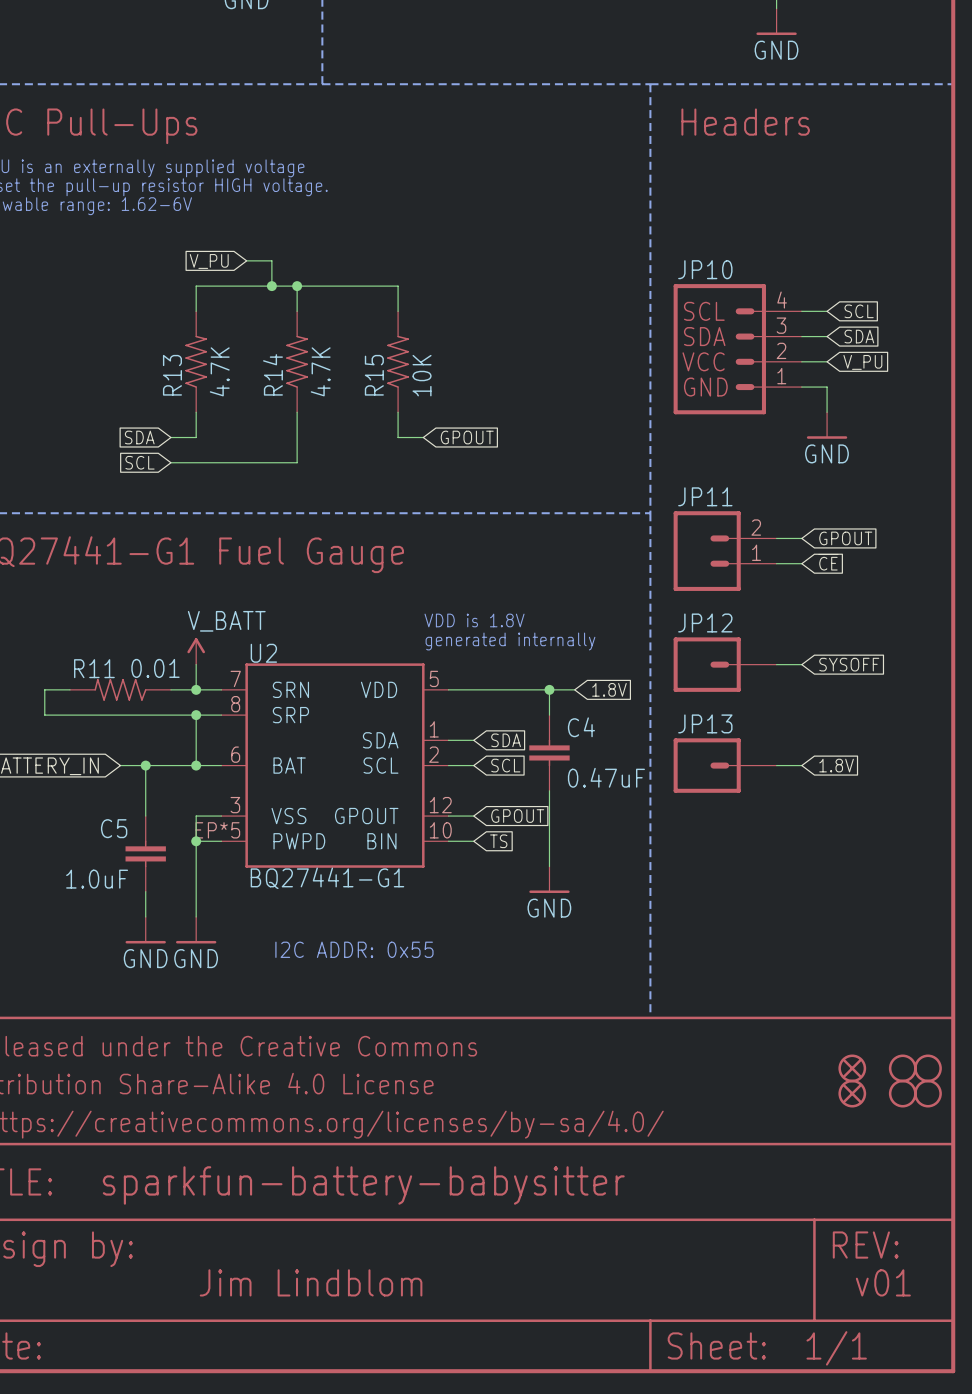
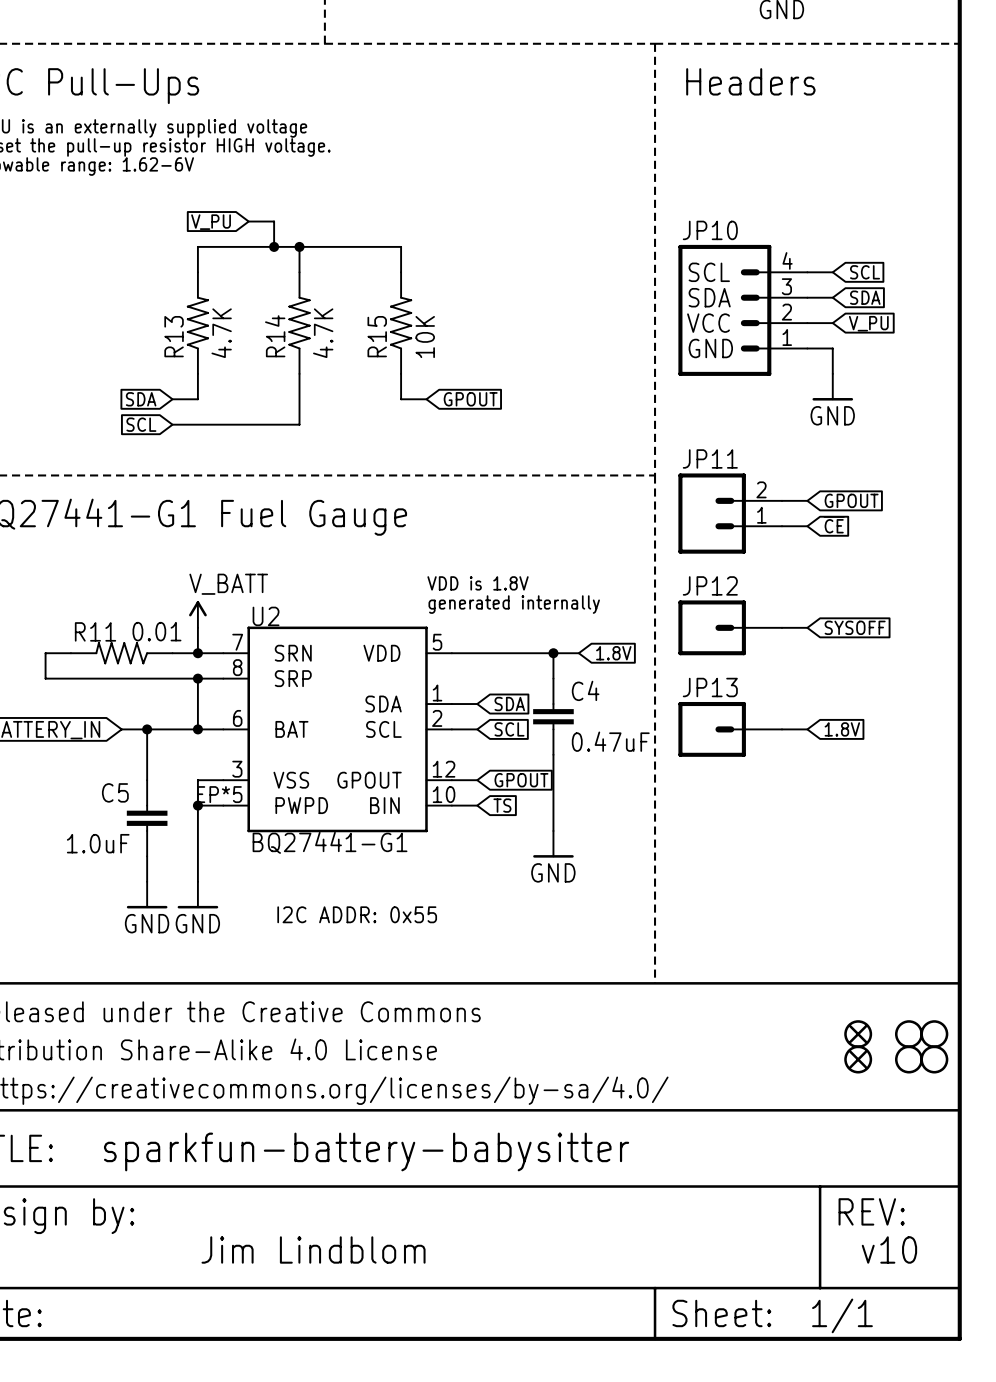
text: v01 (883, 1282) -> v10 (889, 1249)

